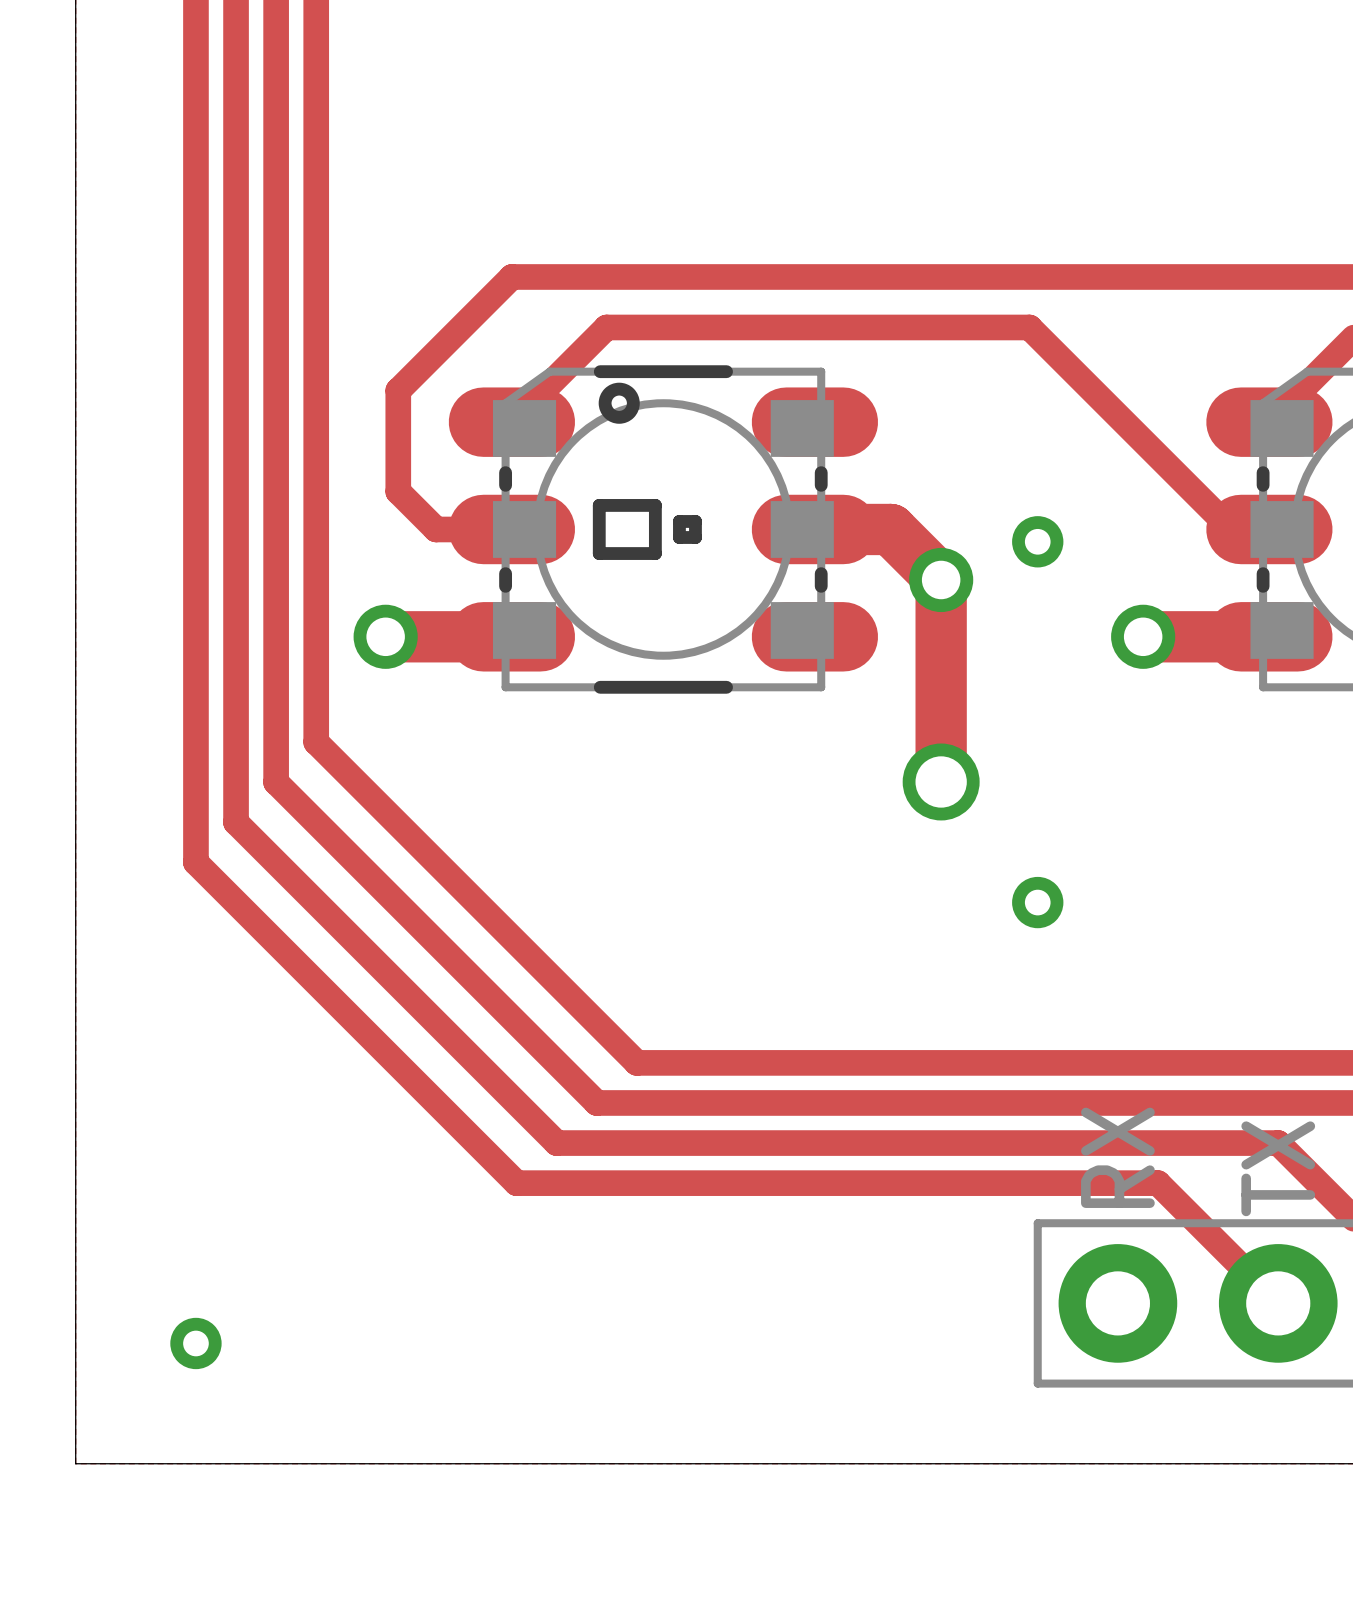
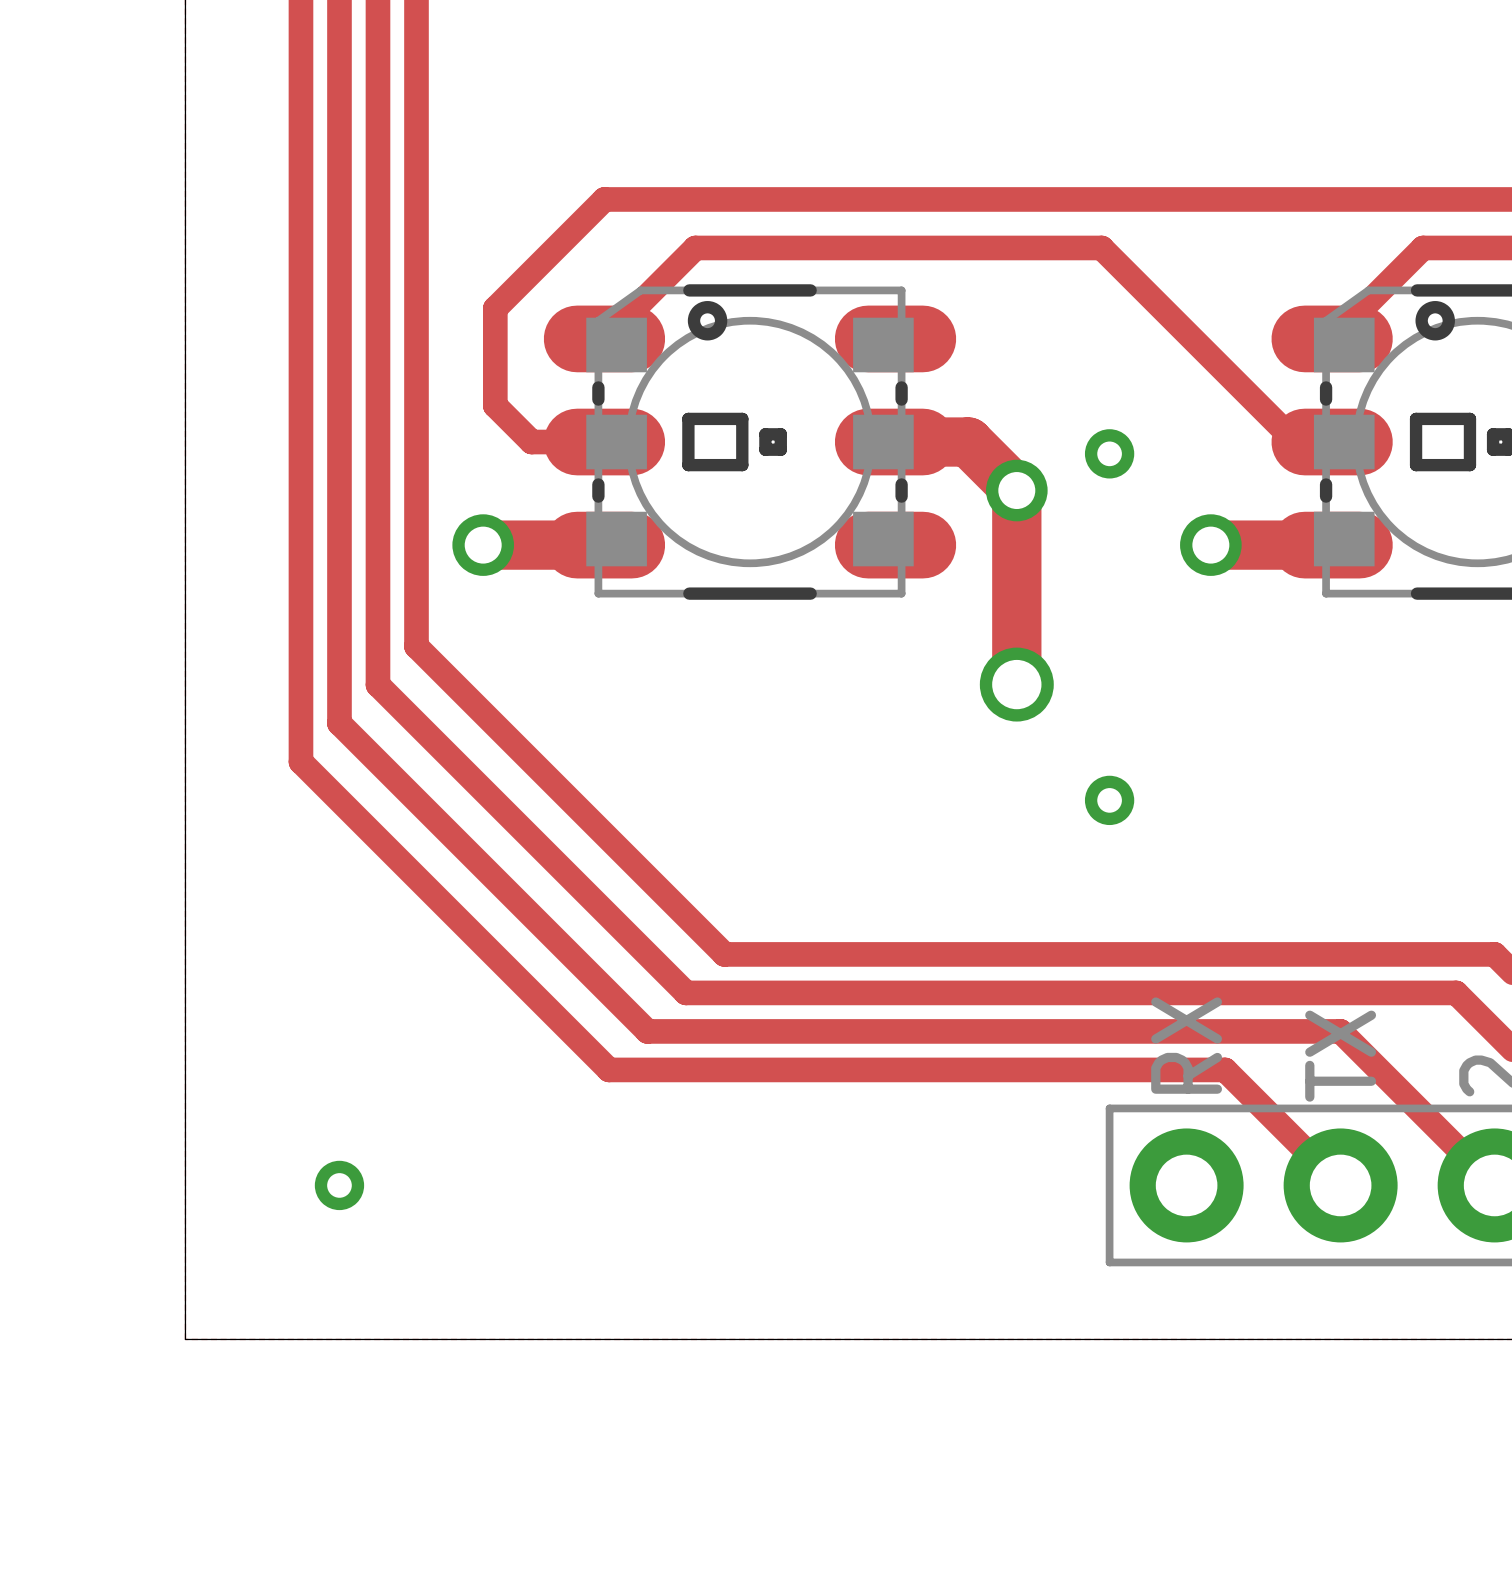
via position: (195, 1343) -> (339, 1185)

